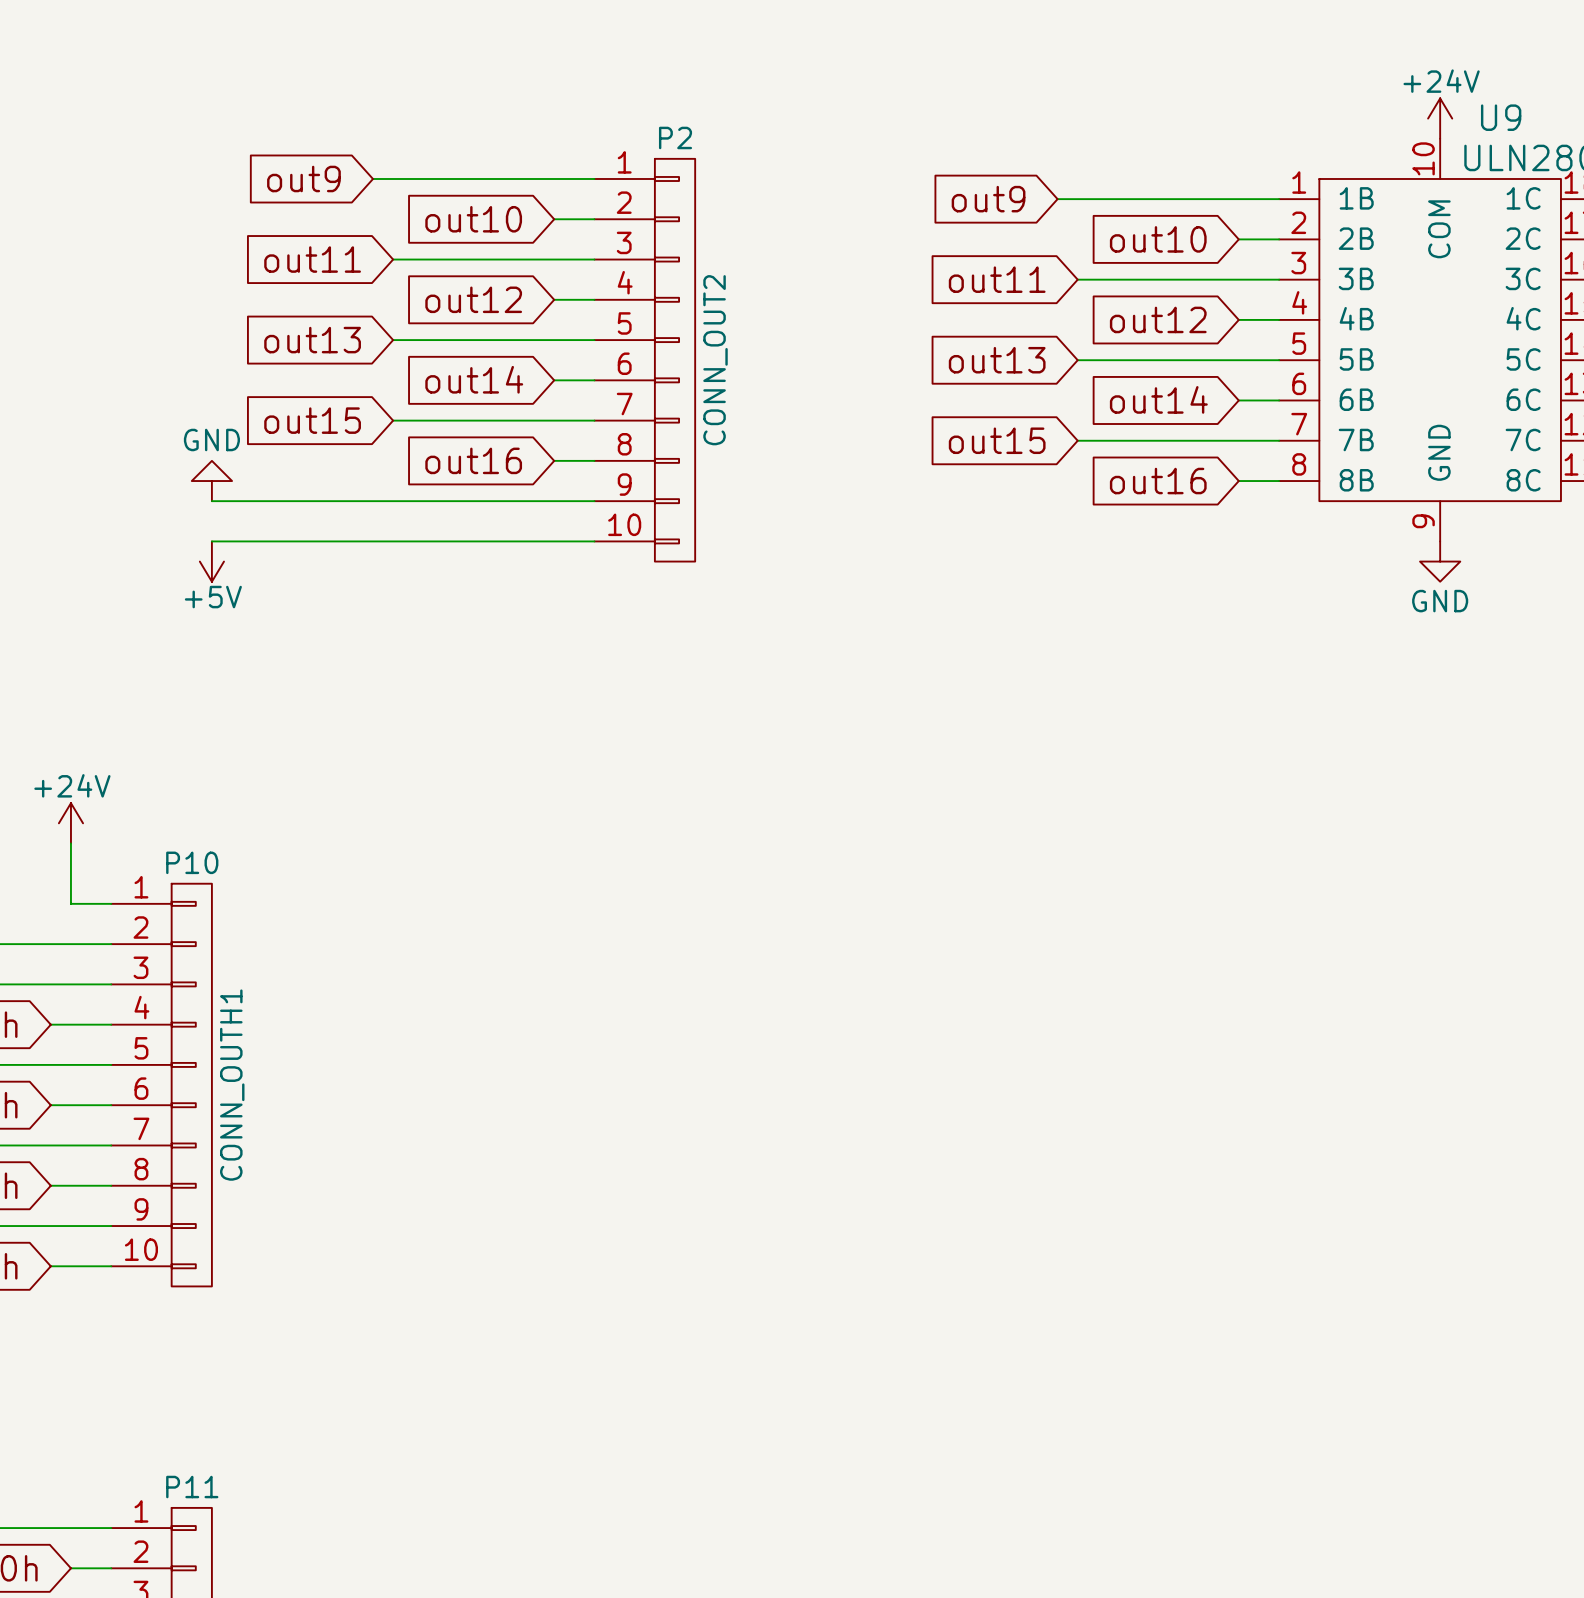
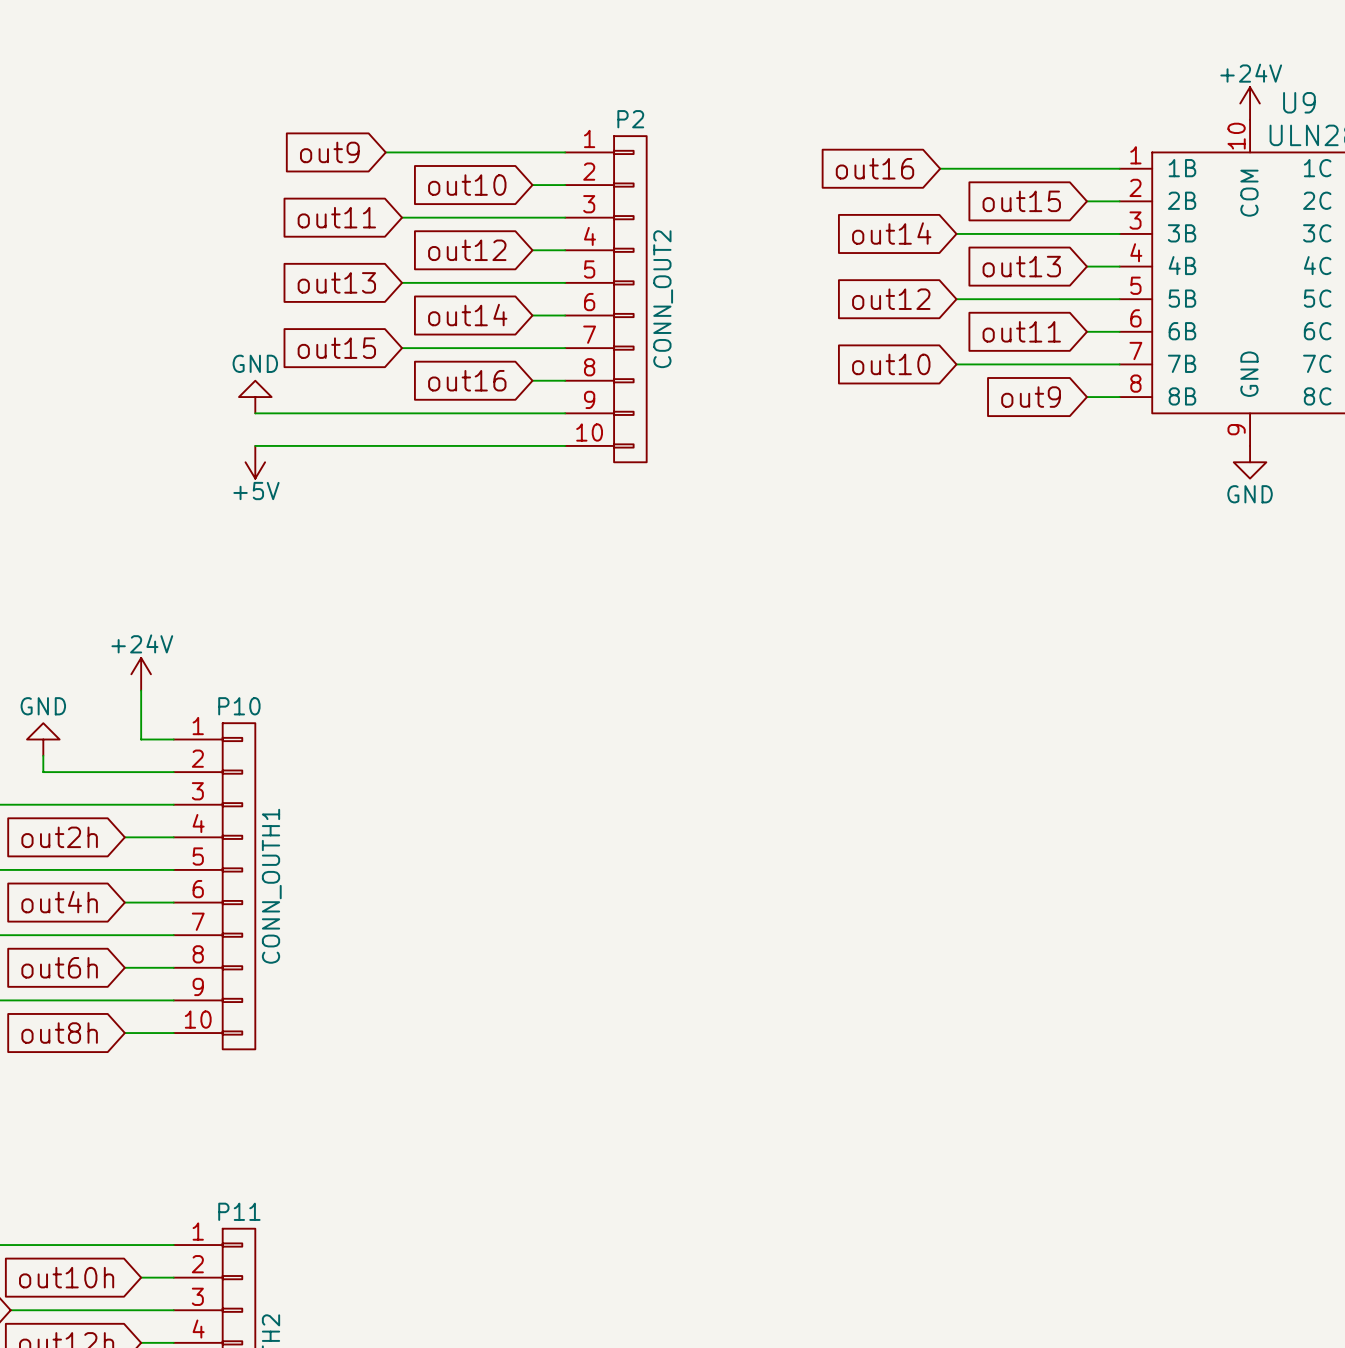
global label: out9 (988, 199) -> out16 (874, 168)
global label: out10 (1158, 239) -> out15 (1021, 201)
global label: out11 (997, 279) -> out14 (891, 233)
global label: out12 (1158, 319) -> out13 (1021, 266)
global label: out13 (997, 360) -> out12 (891, 299)
global label: out14 (1158, 399) -> out11 (1021, 331)
global label: out15 (997, 440) -> out10 (891, 364)
global label: out16 (1158, 481) -> out9 (1031, 397)

